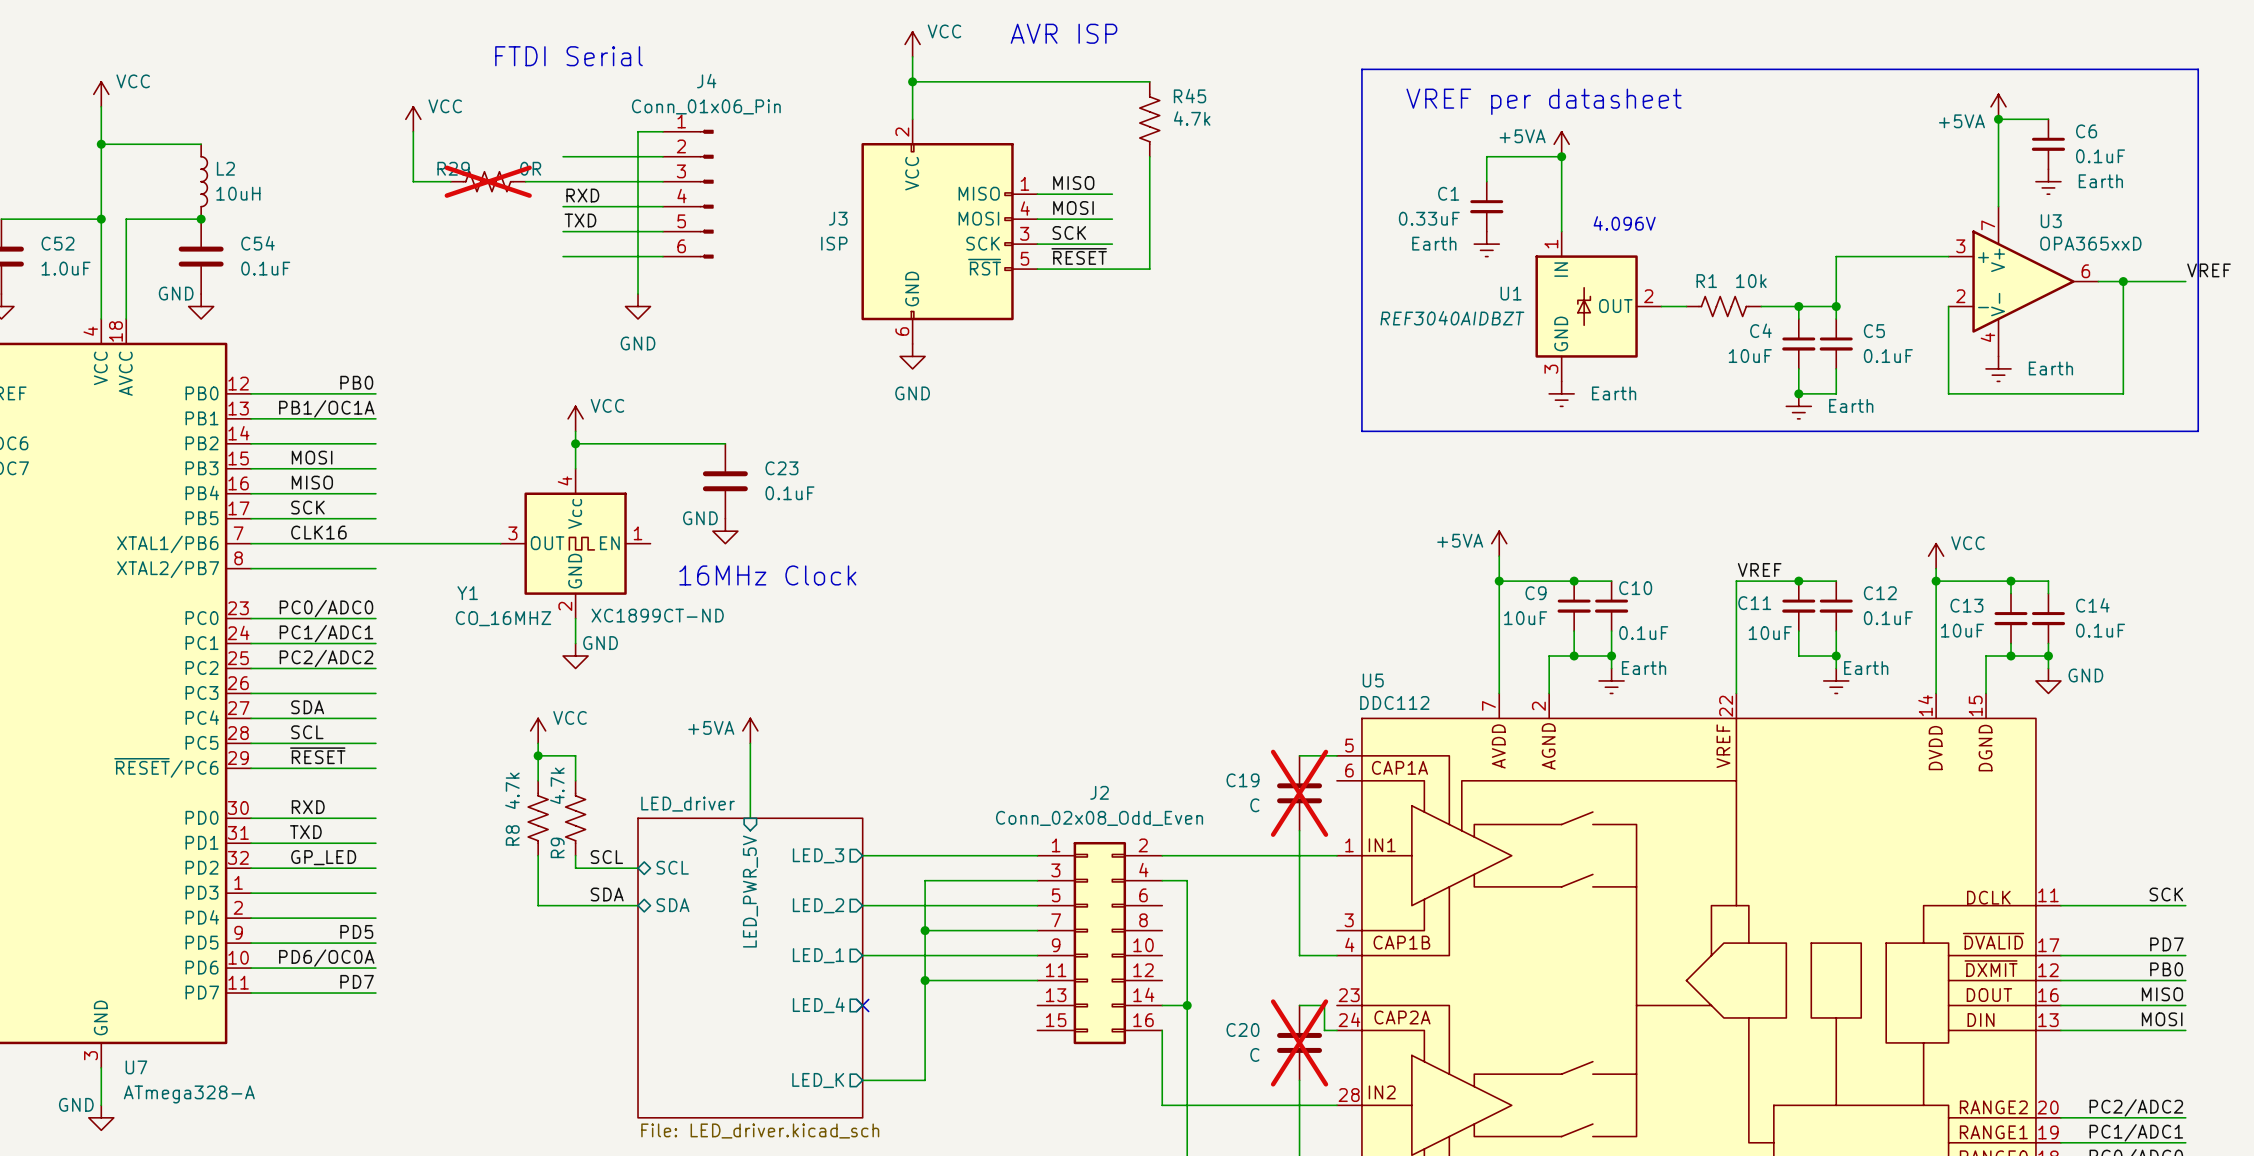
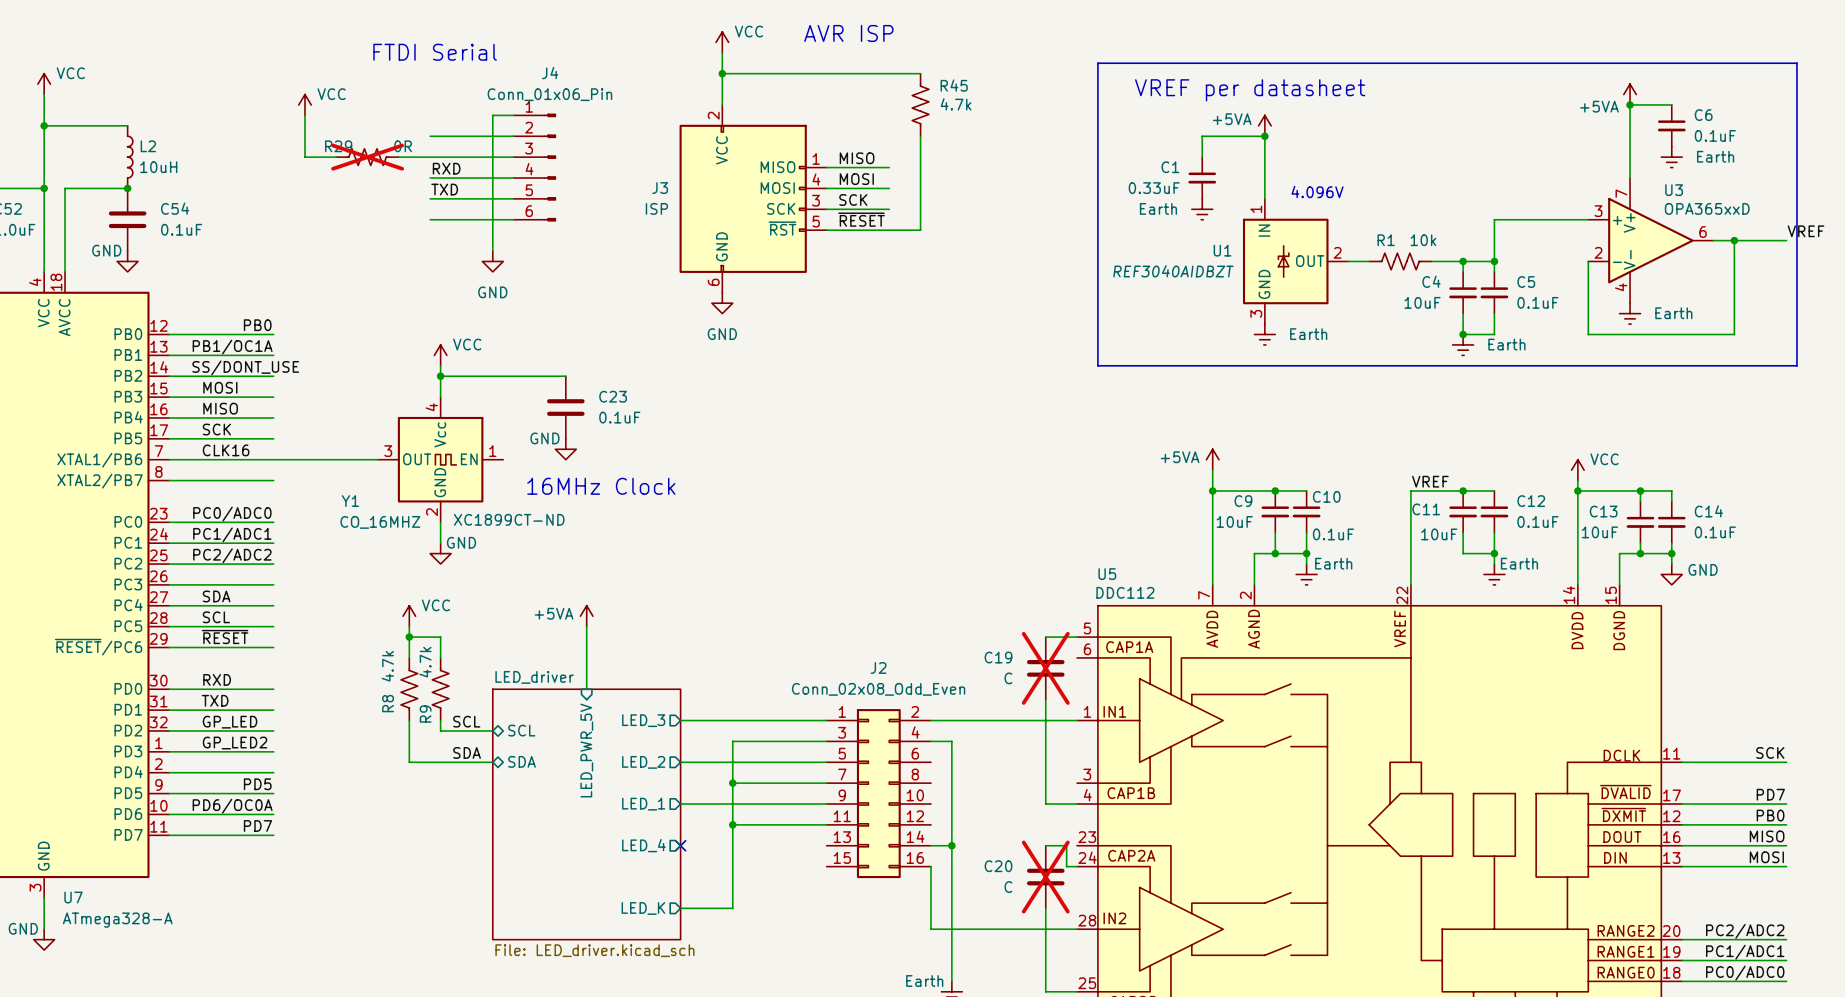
label: none -> SS/DONT_USE (245, 367)
label: none -> GP_LED2 (235, 743)

